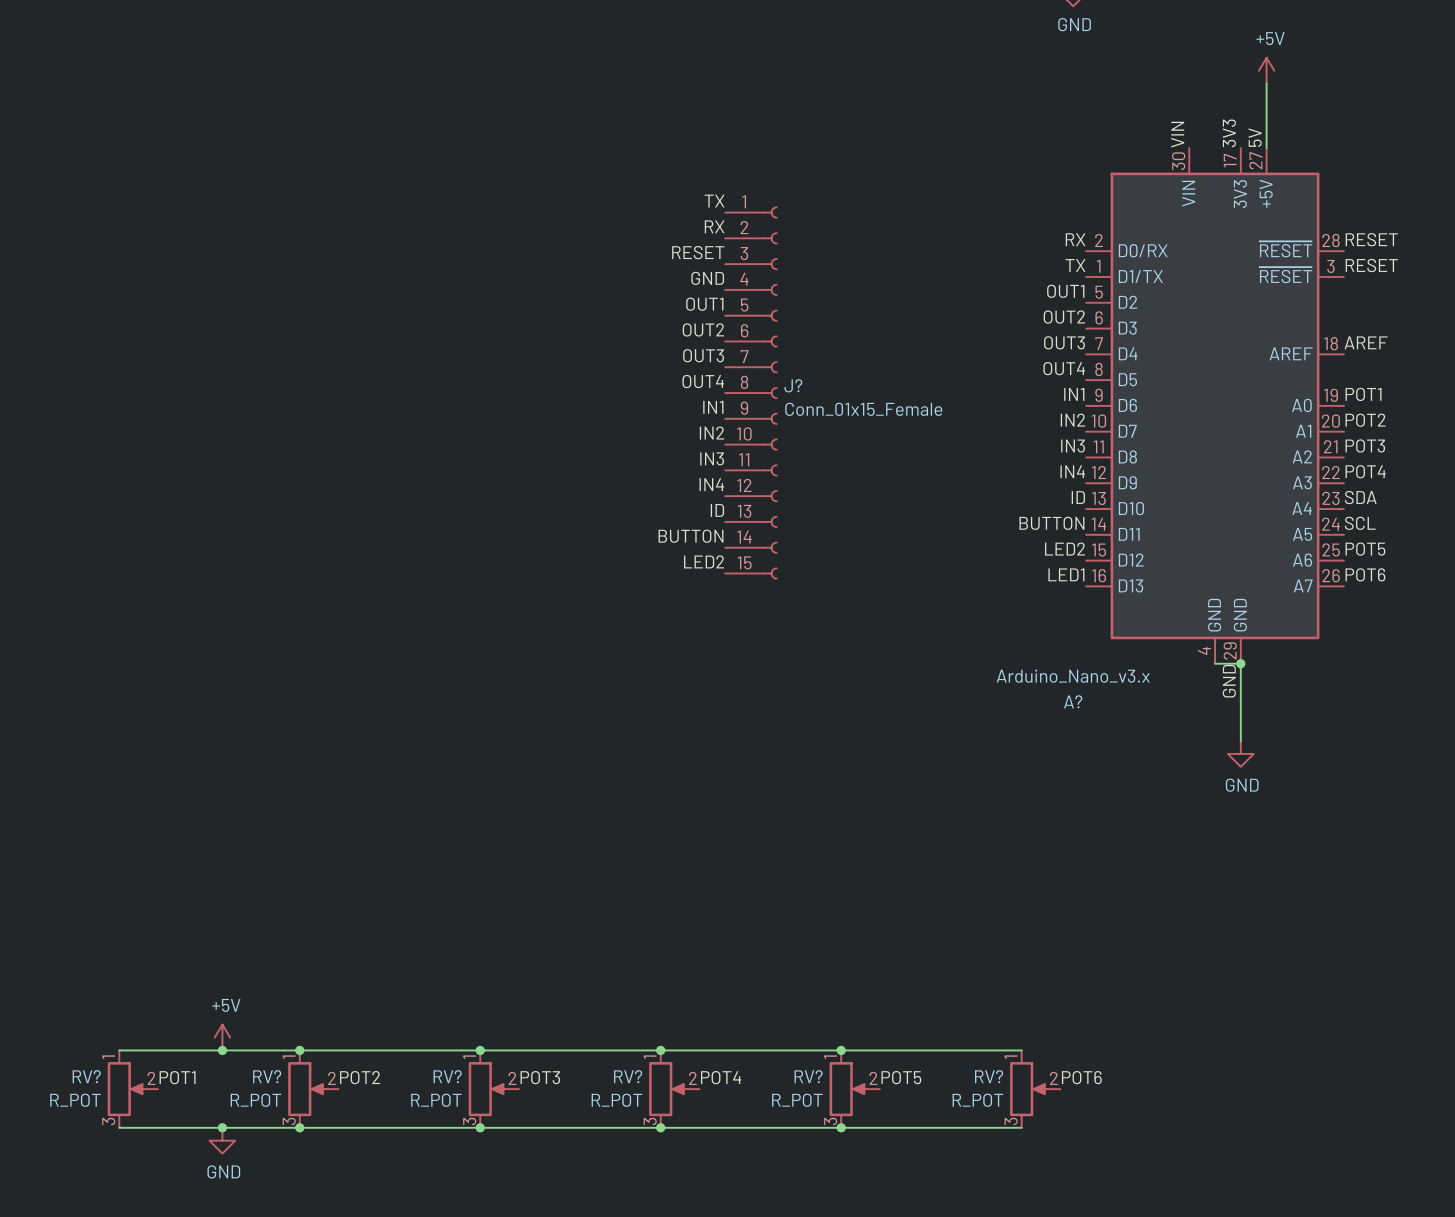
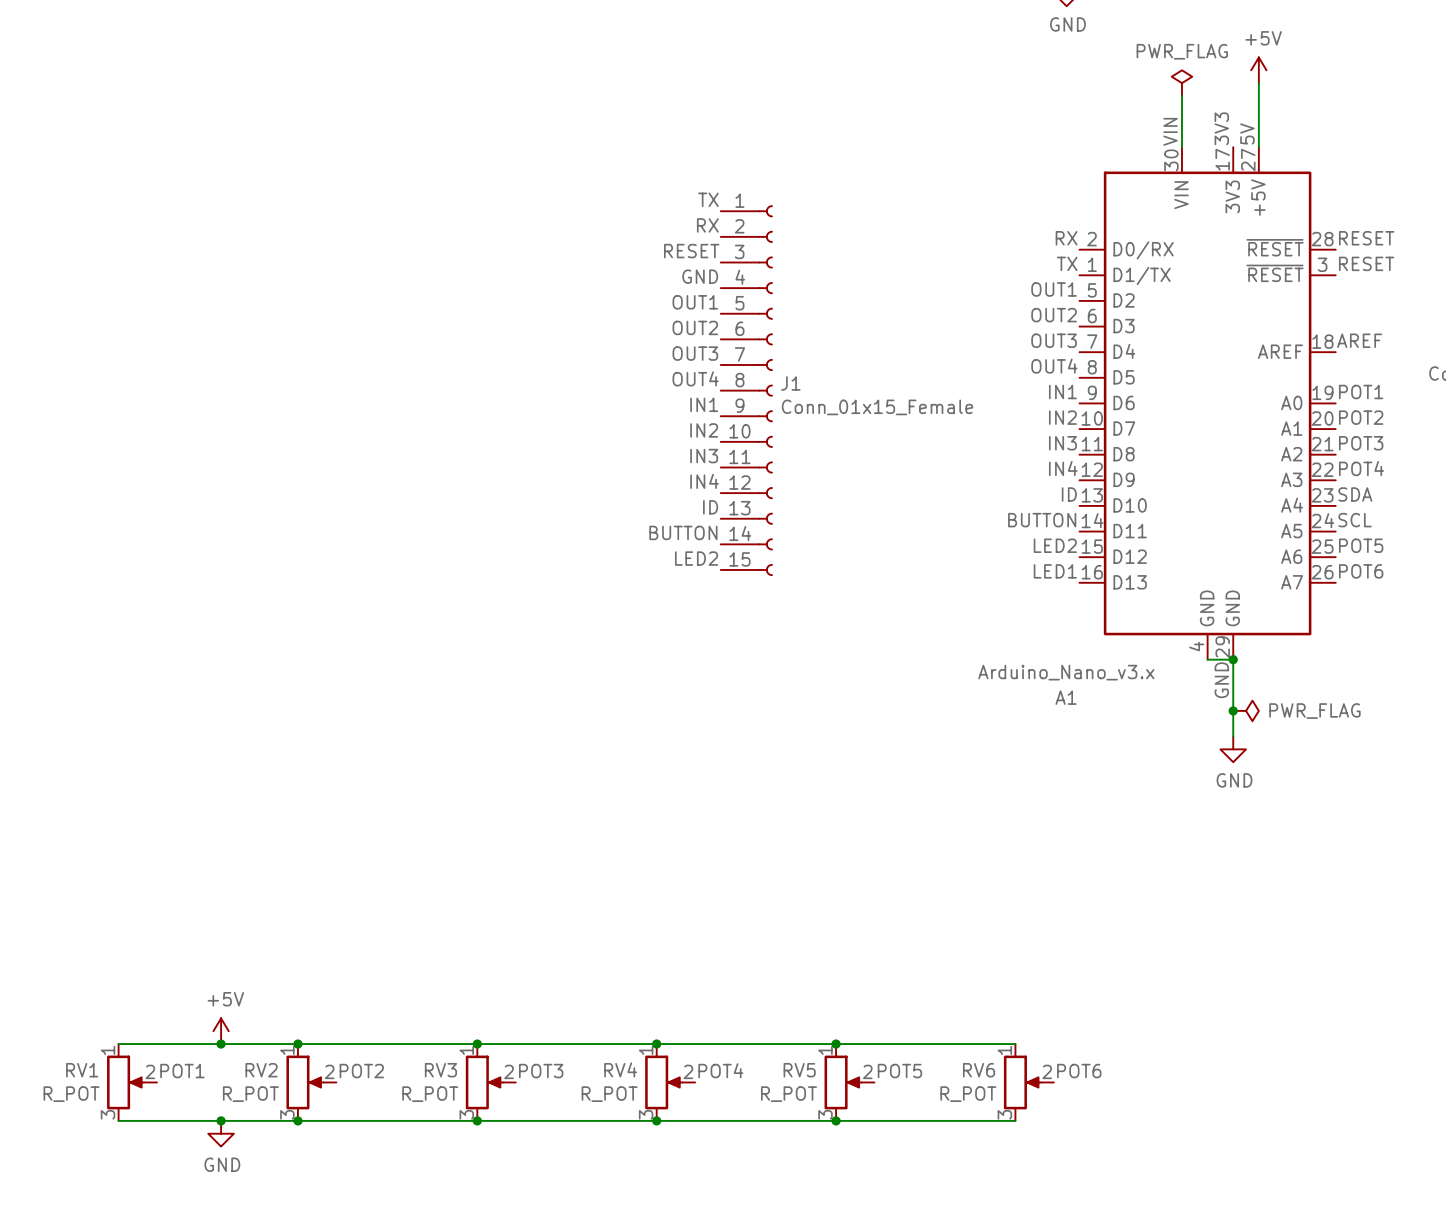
power symbol: none -> PWR_FLAG (1181, 83)
wire: none -> (1181, 95) (1181, 147)
J? name: J? (793, 385) -> J1 (790, 383)
A? name: A? (1073, 701) -> A1 (1066, 697)
junction: none -> (1233, 710)
power symbol: none -> PWR_FLAG (1246, 710)
RV? name: RV? (86, 1076) -> RV1 (82, 1070)
RV? name: RV? (267, 1076) -> RV2 (261, 1070)
RV? name: RV? (447, 1076) -> RV3 (440, 1070)
RV? name: RV? (628, 1076) -> RV4 (620, 1069)
RV? name: RV? (808, 1076) -> RV5 (799, 1070)
RV? name: RV? (989, 1076) -> RV6 (979, 1070)

